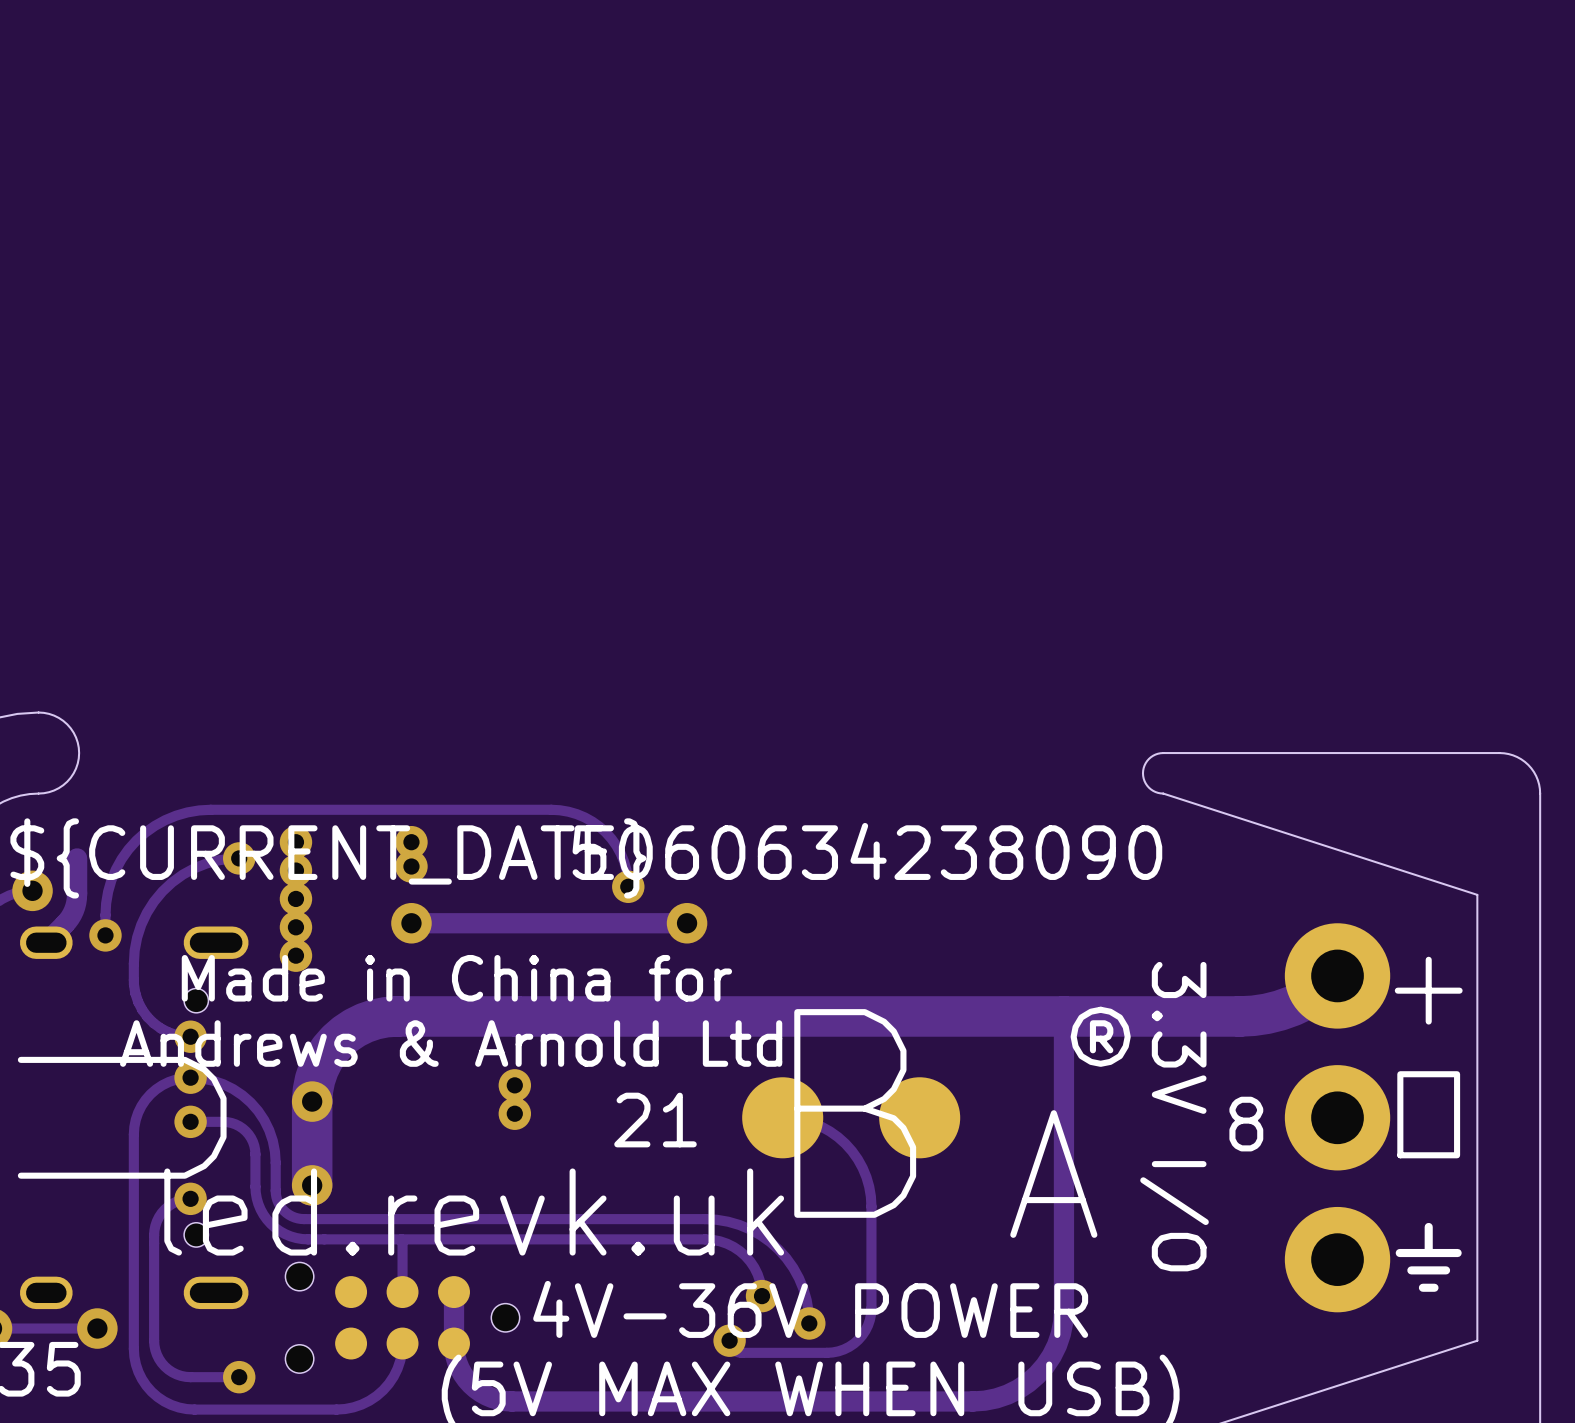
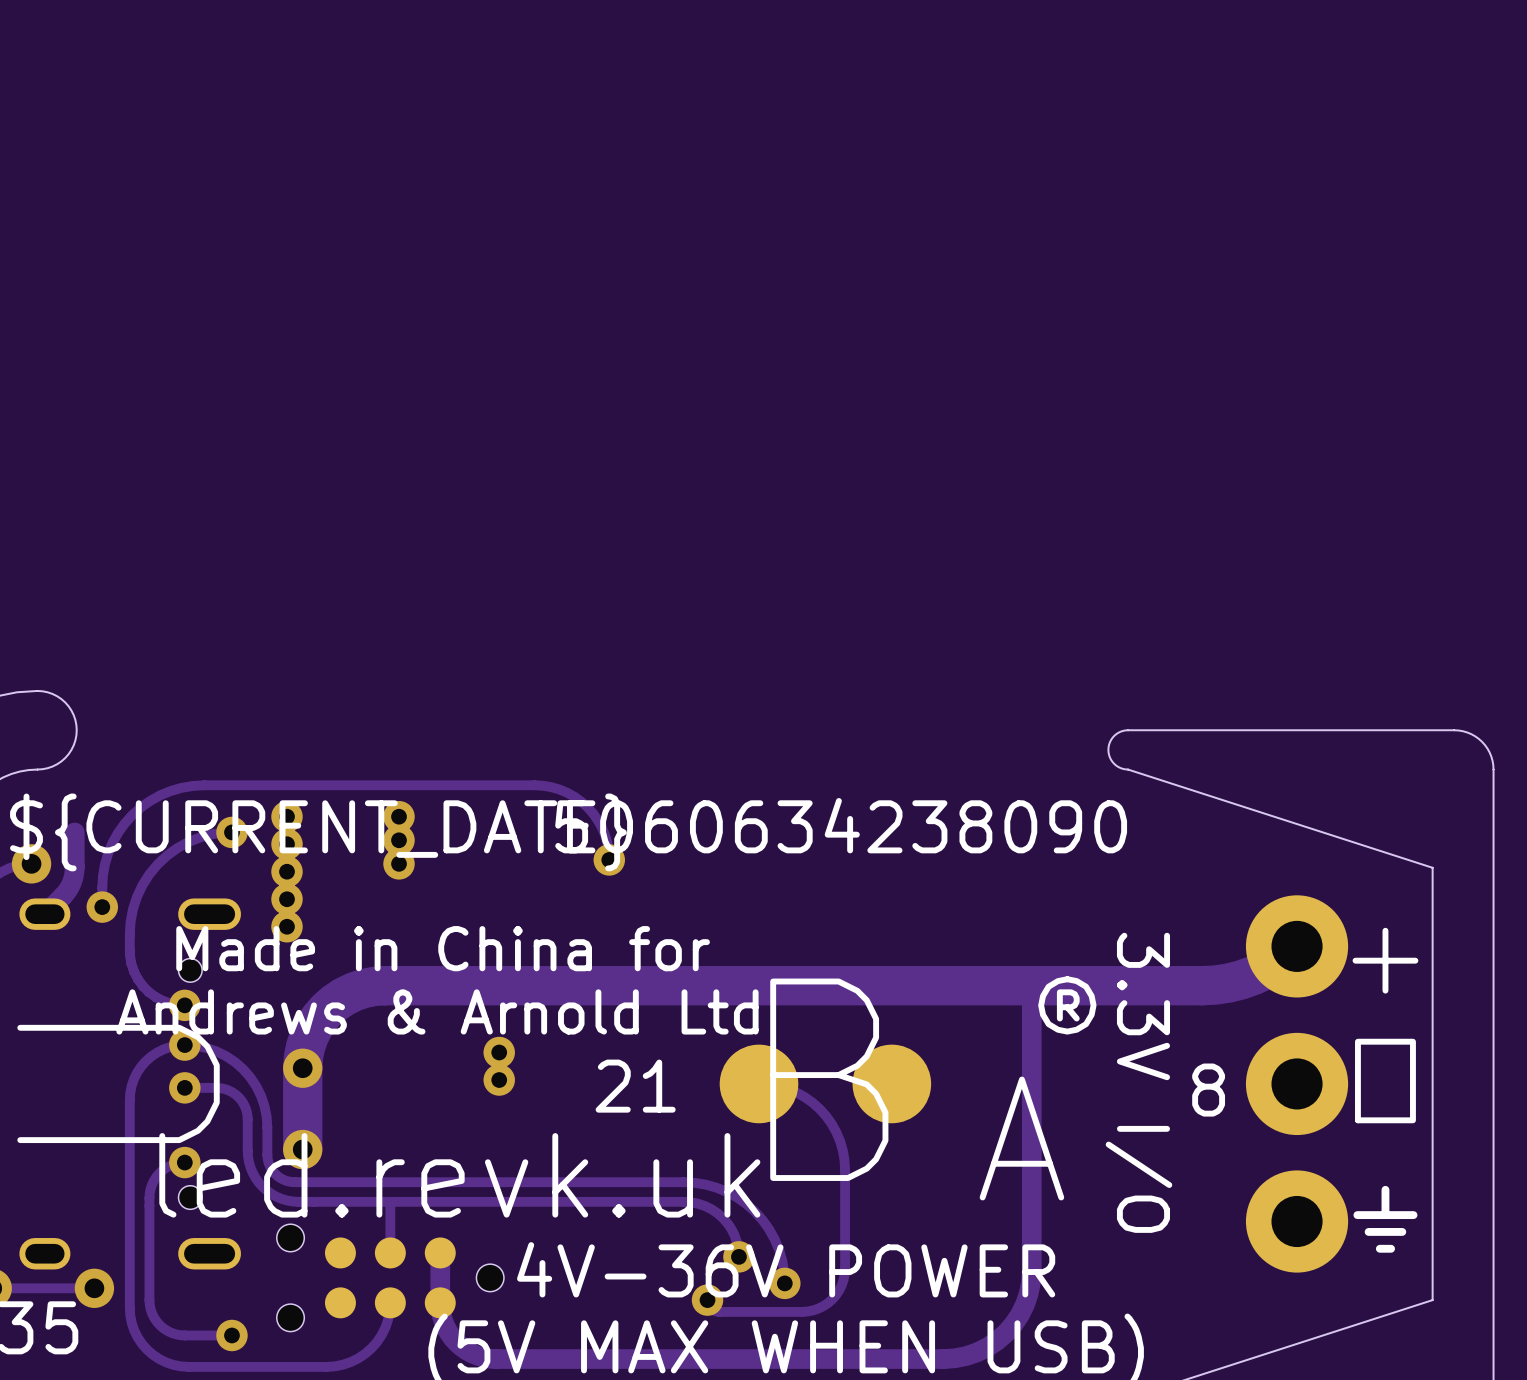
via position: (411, 923) -> (399, 863)
track: (687, 923) (411, 923) -> none
via: (687, 923) -> none

